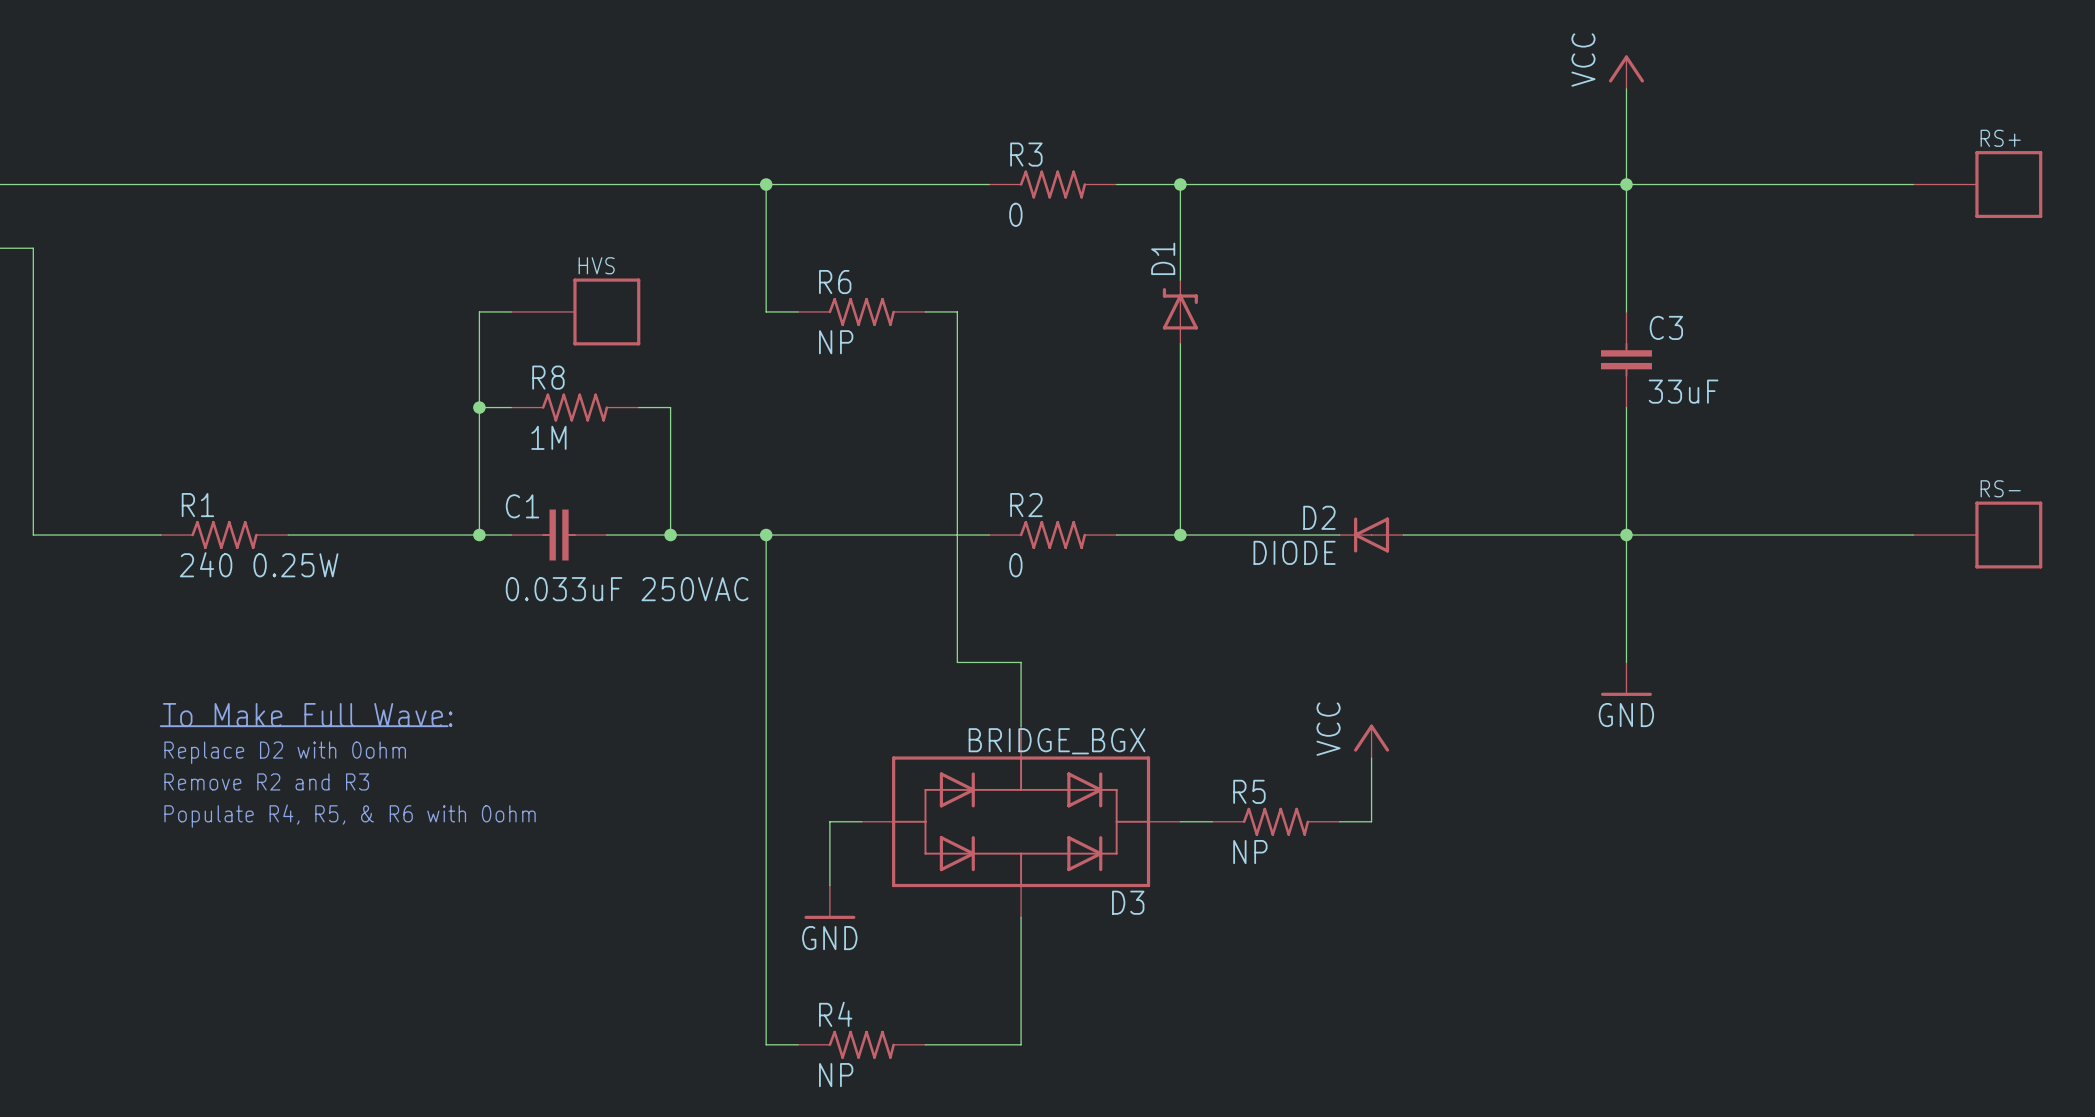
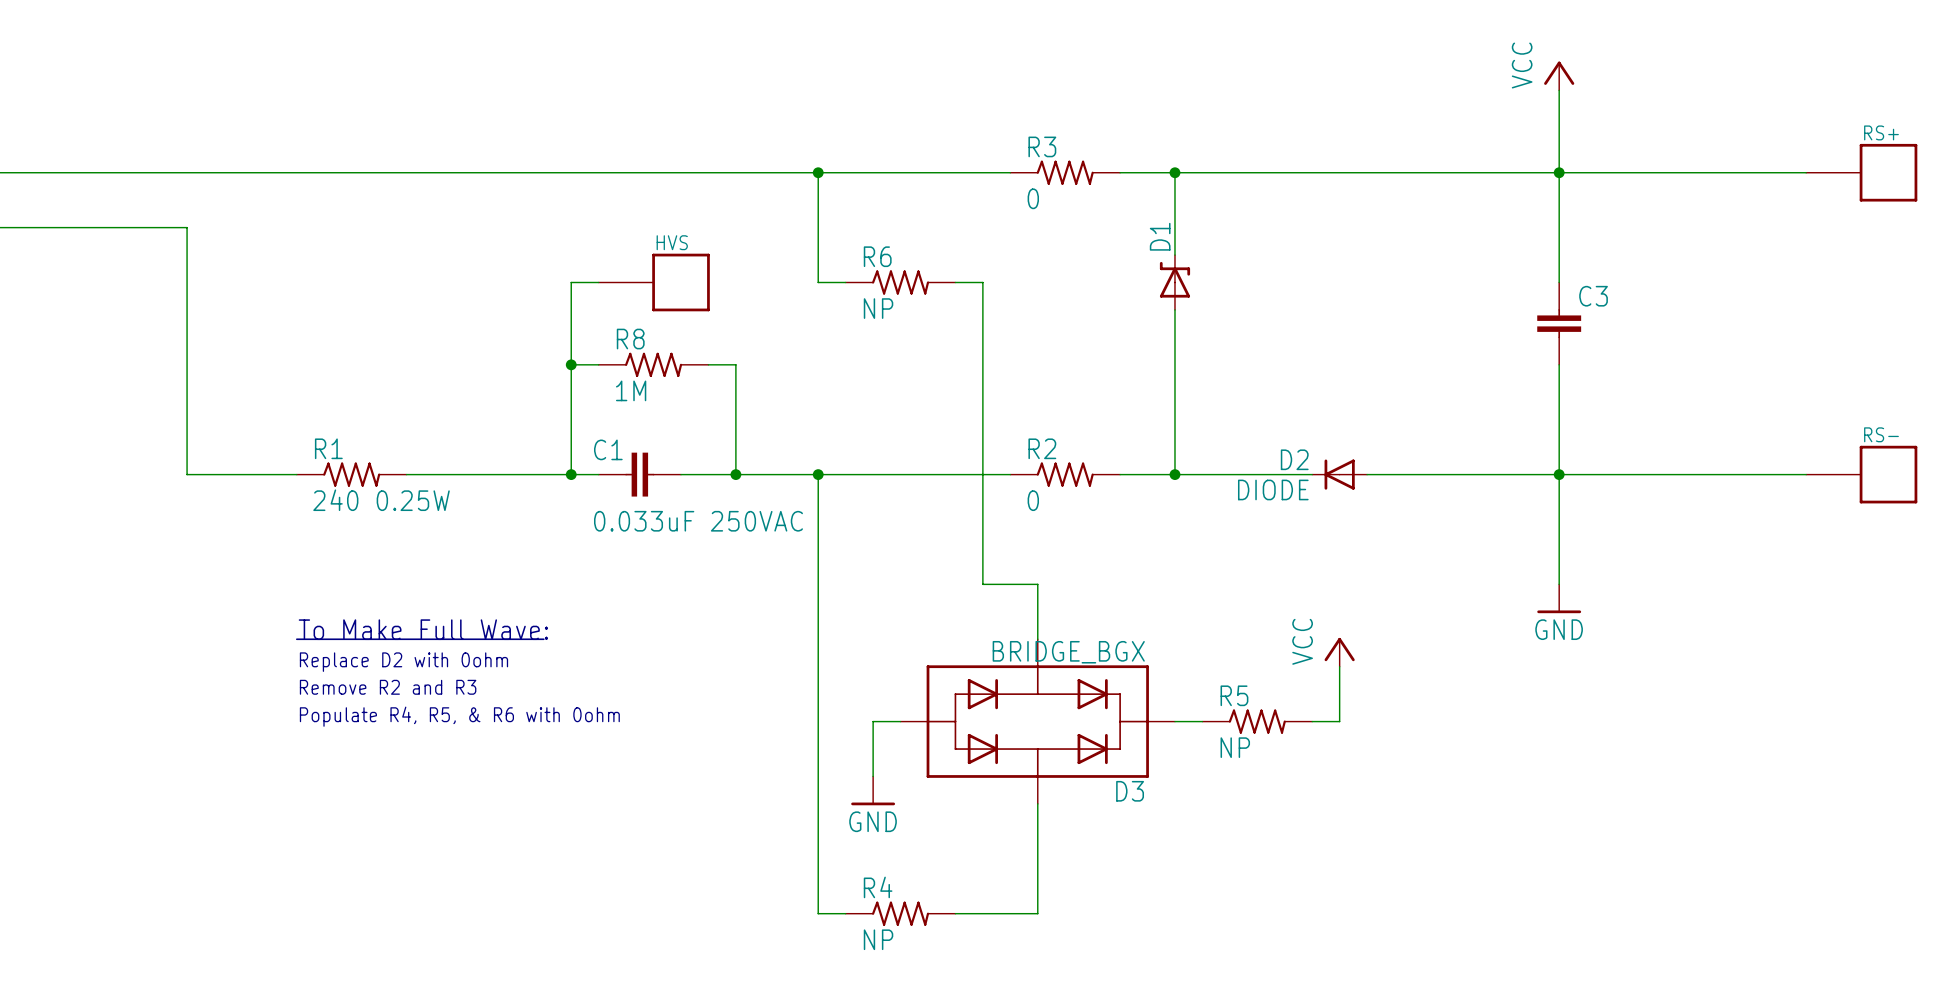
C3 value: 33uF (1683, 391) -> none

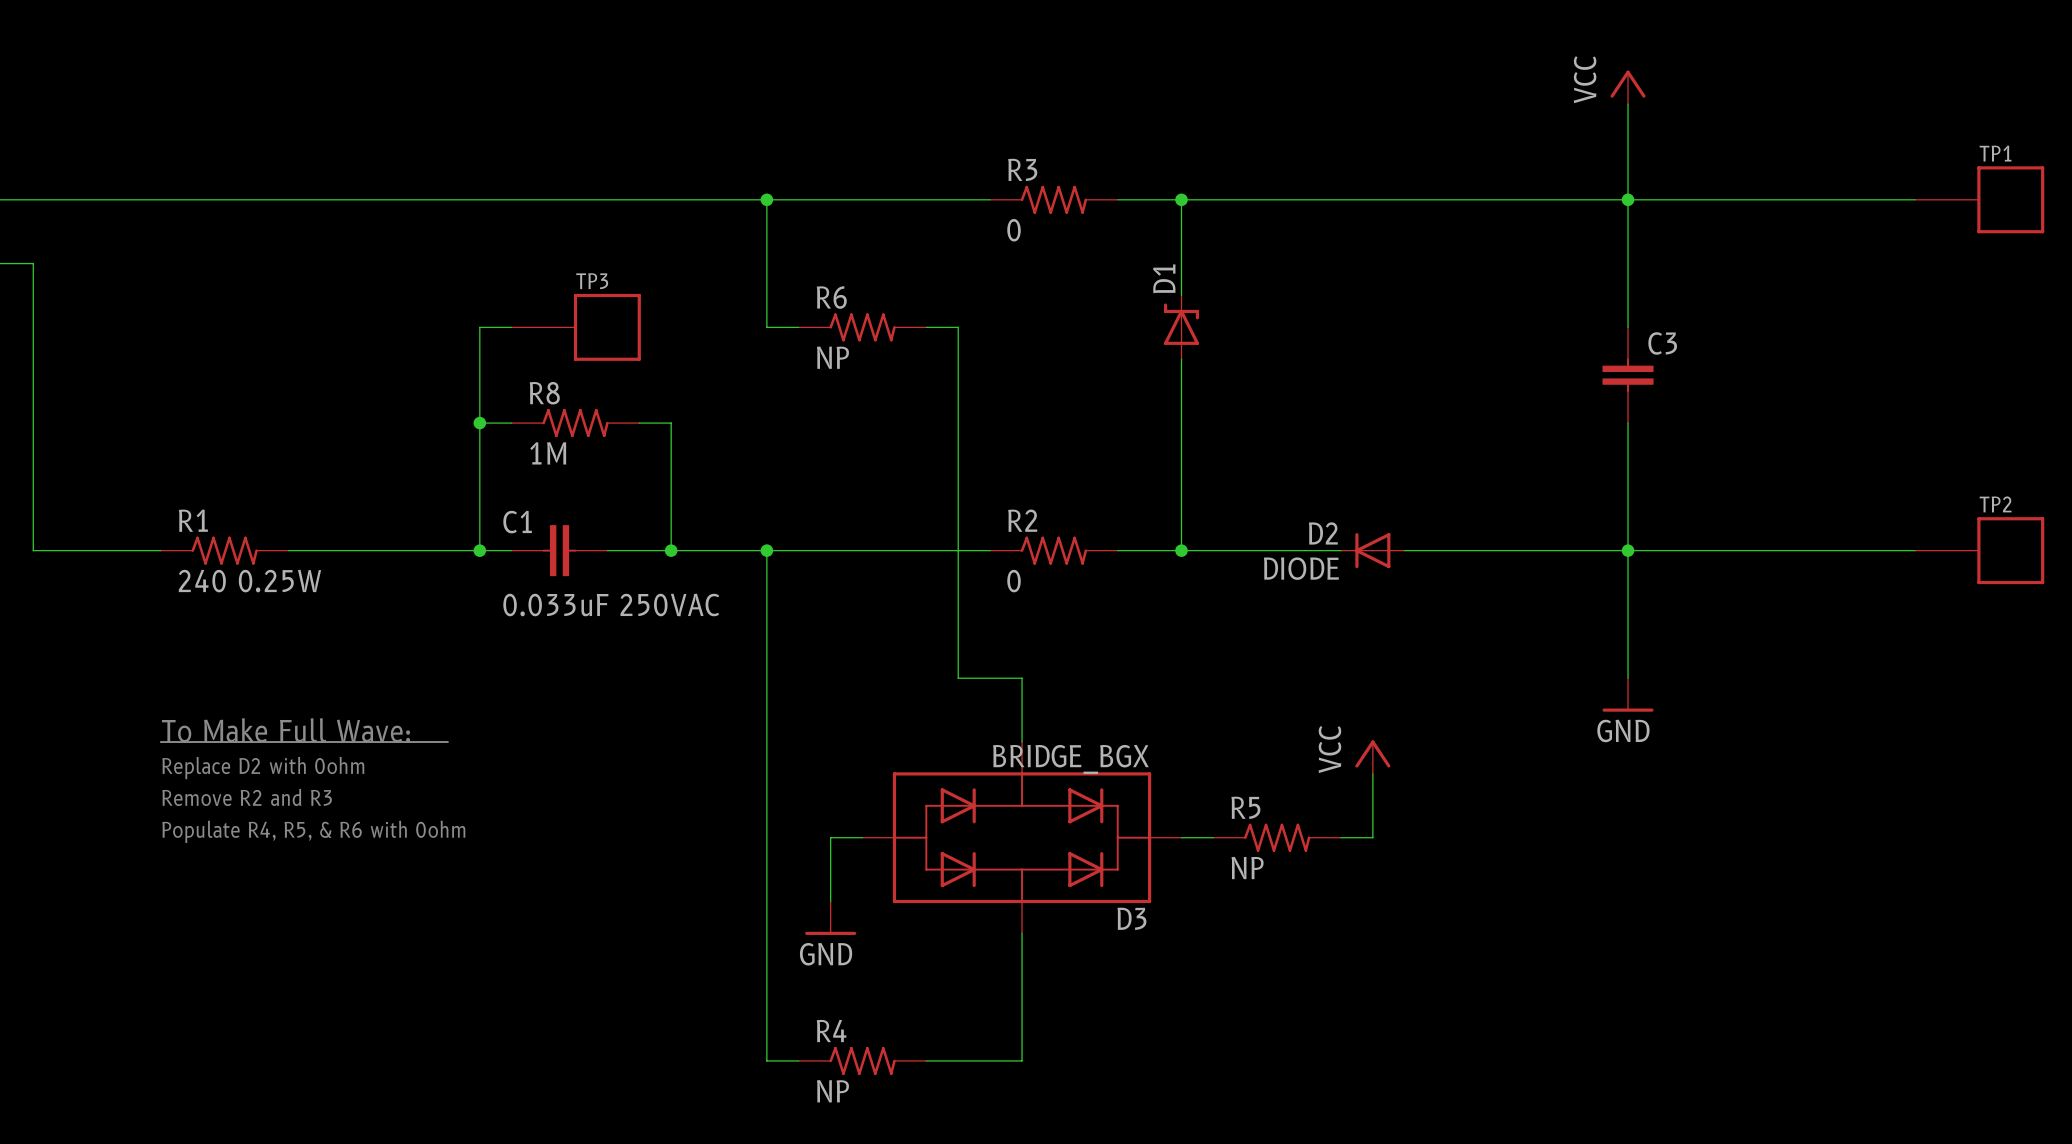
RS+ name: RS+ (1881, 132) -> TP1 (1995, 153)
HVS name: HVS (672, 242) -> TP3 (592, 281)
RS- name: RS- (1881, 434) -> TP2 (1995, 504)

